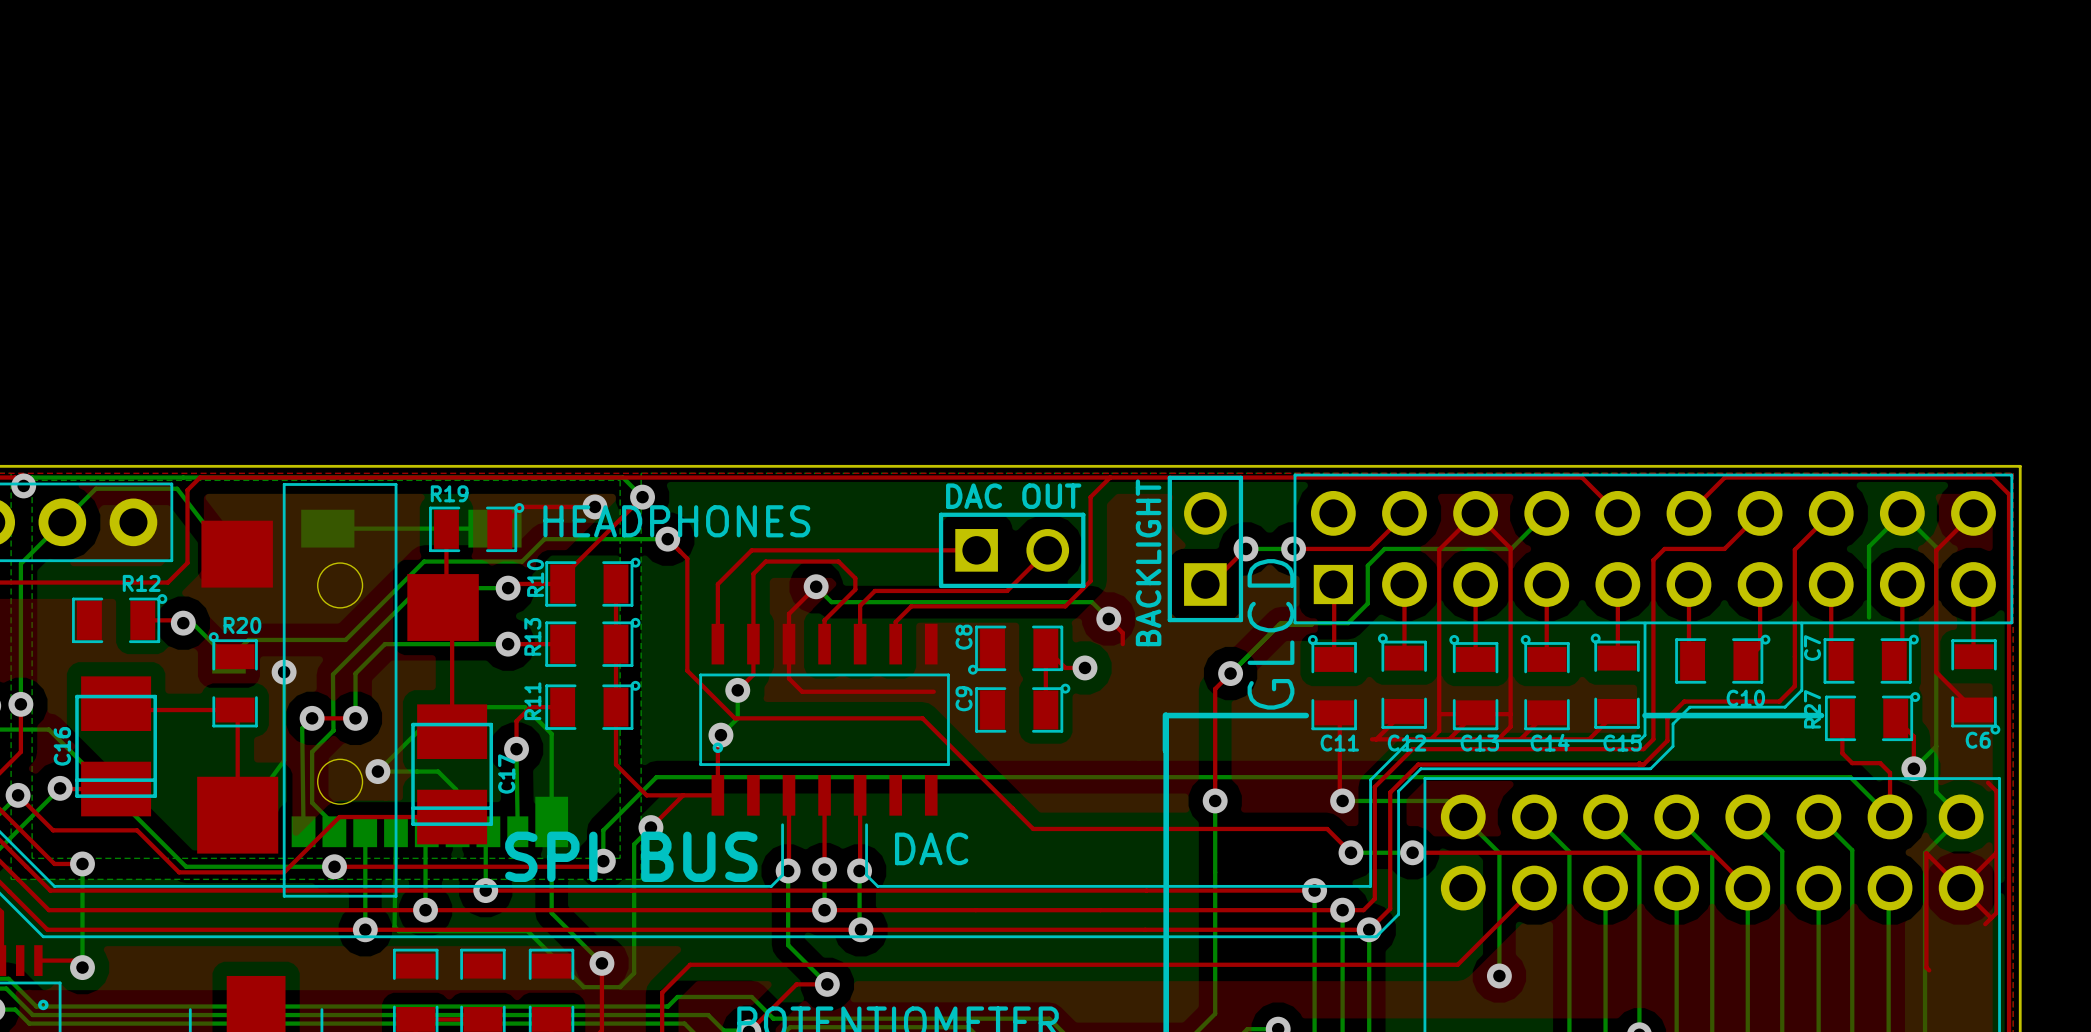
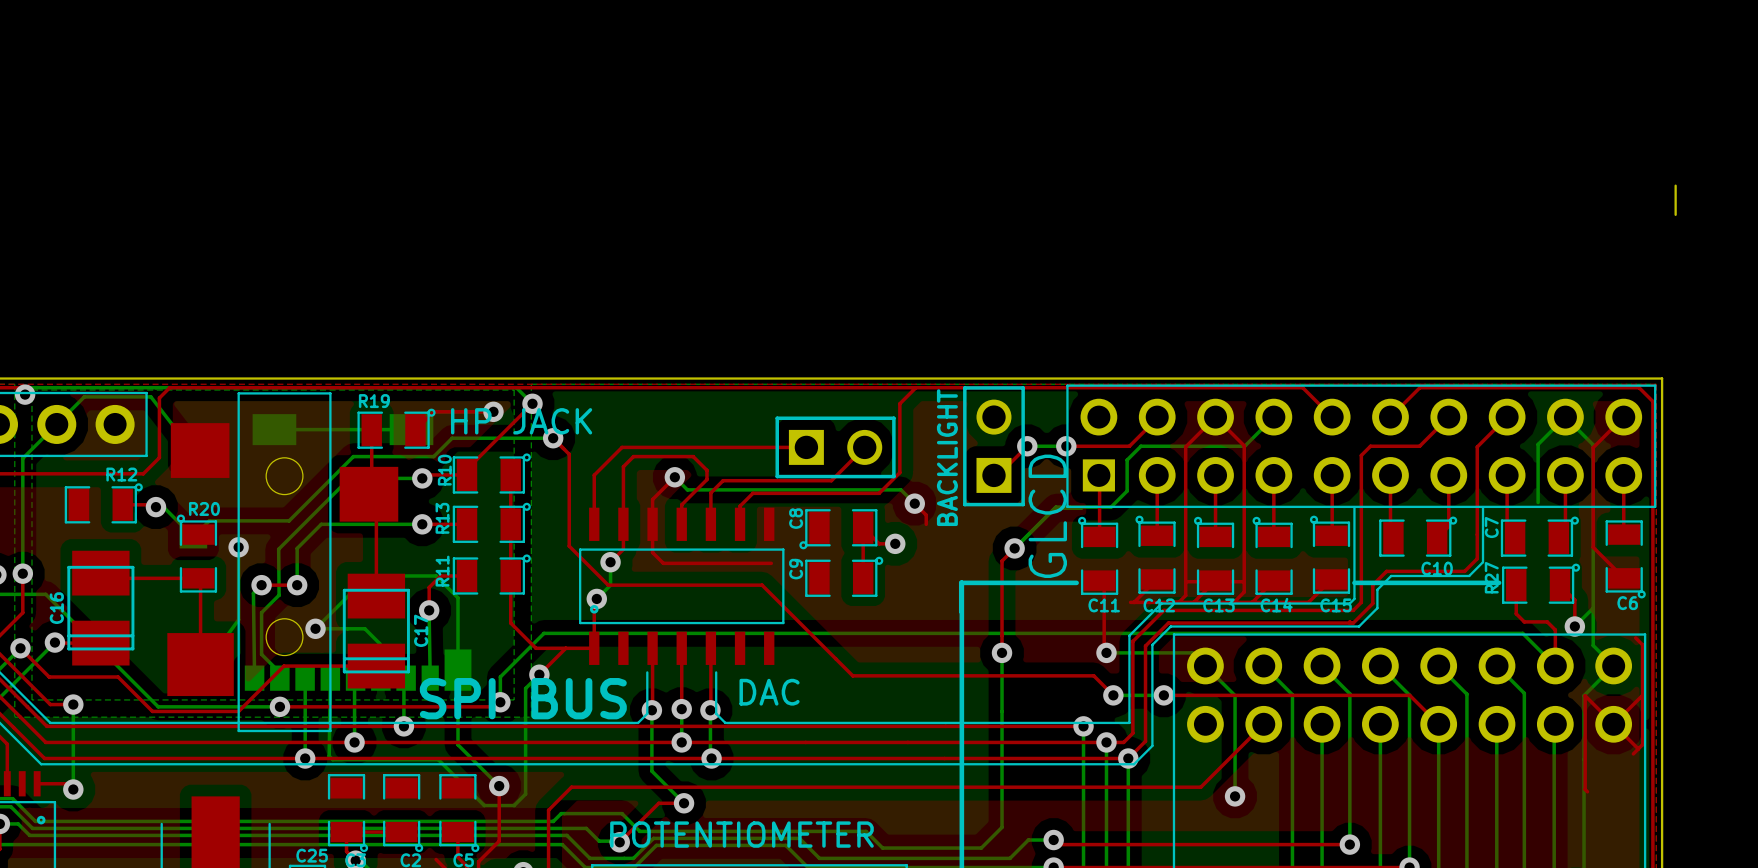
board edge: none -> (1675, 185) (1675, 214)
DAC OUT name: DAC OUT (1013, 496) -> none
part value: HEADPHONES (676, 521) -> HP JACK (521, 421)

